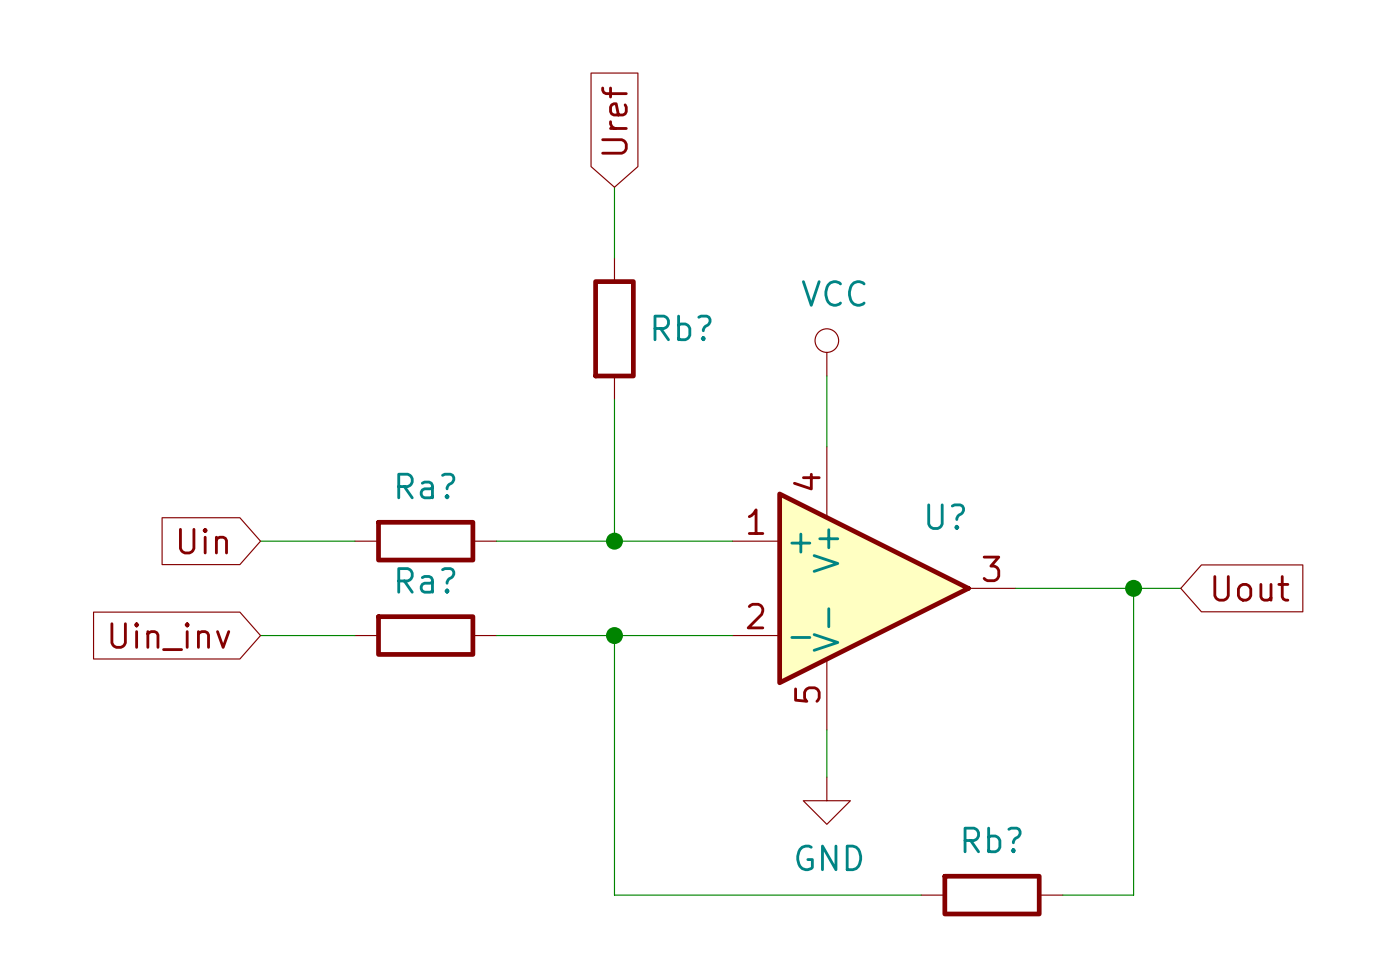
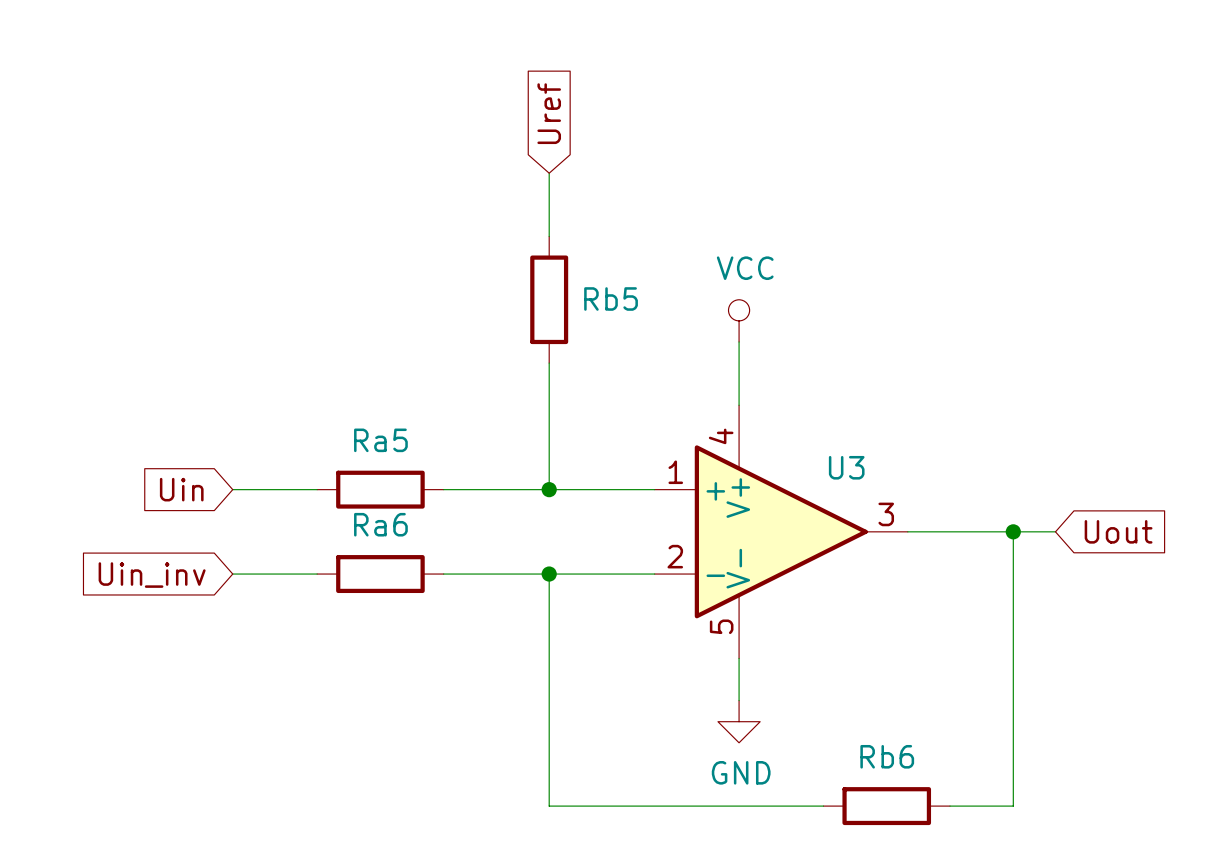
Rb? name: Rb? (682, 327) -> Rb5 (611, 298)
Ra? name: Ra? (426, 486) -> Ra5 (380, 440)
U? name: U? (946, 516) -> U3 (846, 467)
Ra? name: Ra? (426, 580) -> Ra6 (380, 524)
Rb? name: Rb? (992, 839) -> Rb6 (887, 756)

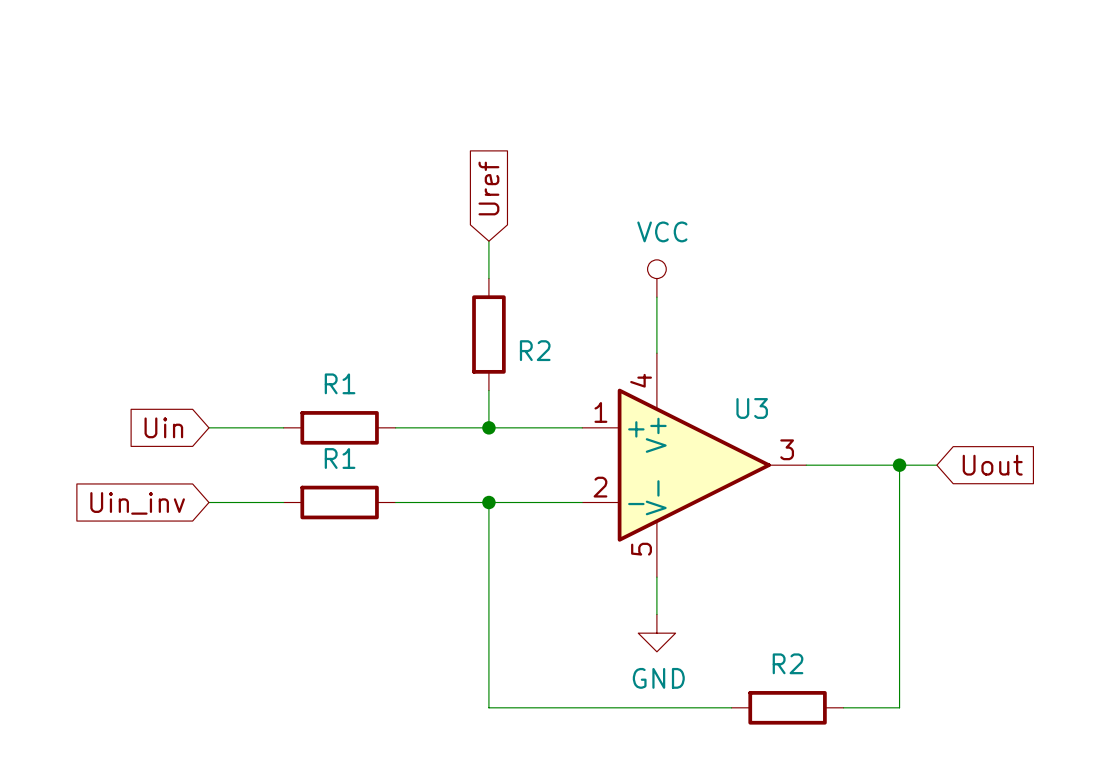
global label position: Uref (549, 113) -> Uref (488, 188)
wire: (549, 173) (549, 236) -> none
wire: none -> (488, 241) (488, 278)
Rb5: (549, 299) -> none
wire: (549, 363) (549, 447) -> none
part: none -> R2 (488, 334)
Ra5 value: none -> R1 (340, 383)
Ra5 name: Ra5 (380, 440) -> none
Ra6 name: Ra6 (380, 524) -> none
Ra6 value: none -> R1 (340, 458)
Rb6 name: Rb6 (887, 756) -> none
Rb6 value: none -> R2 (788, 663)

